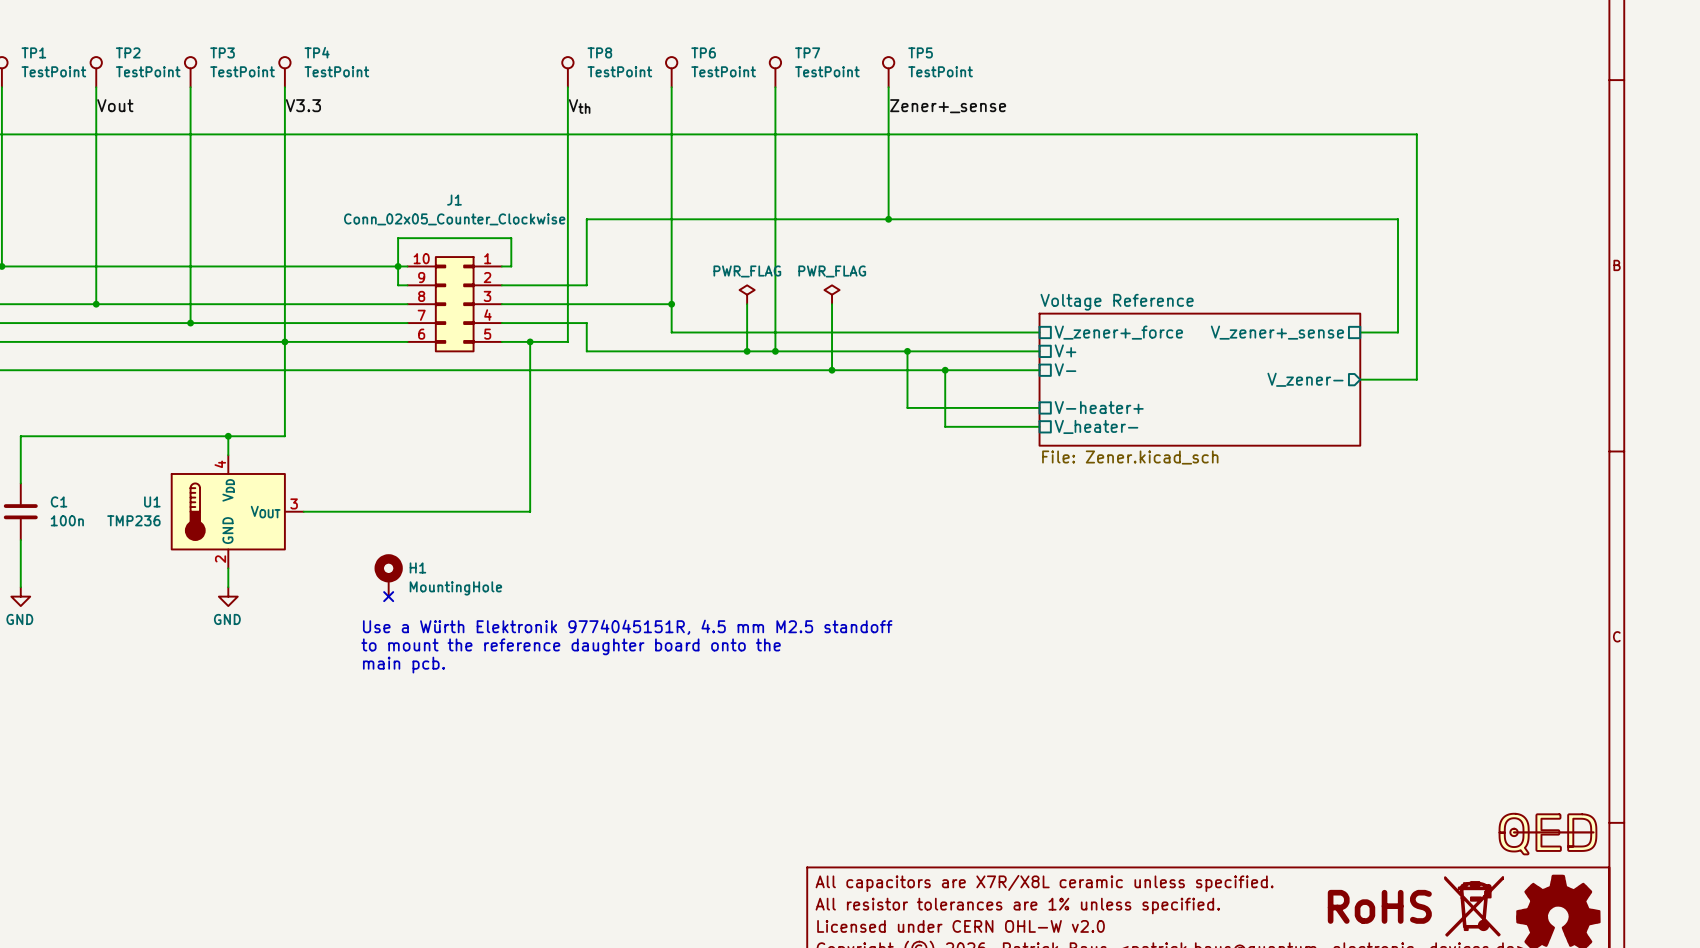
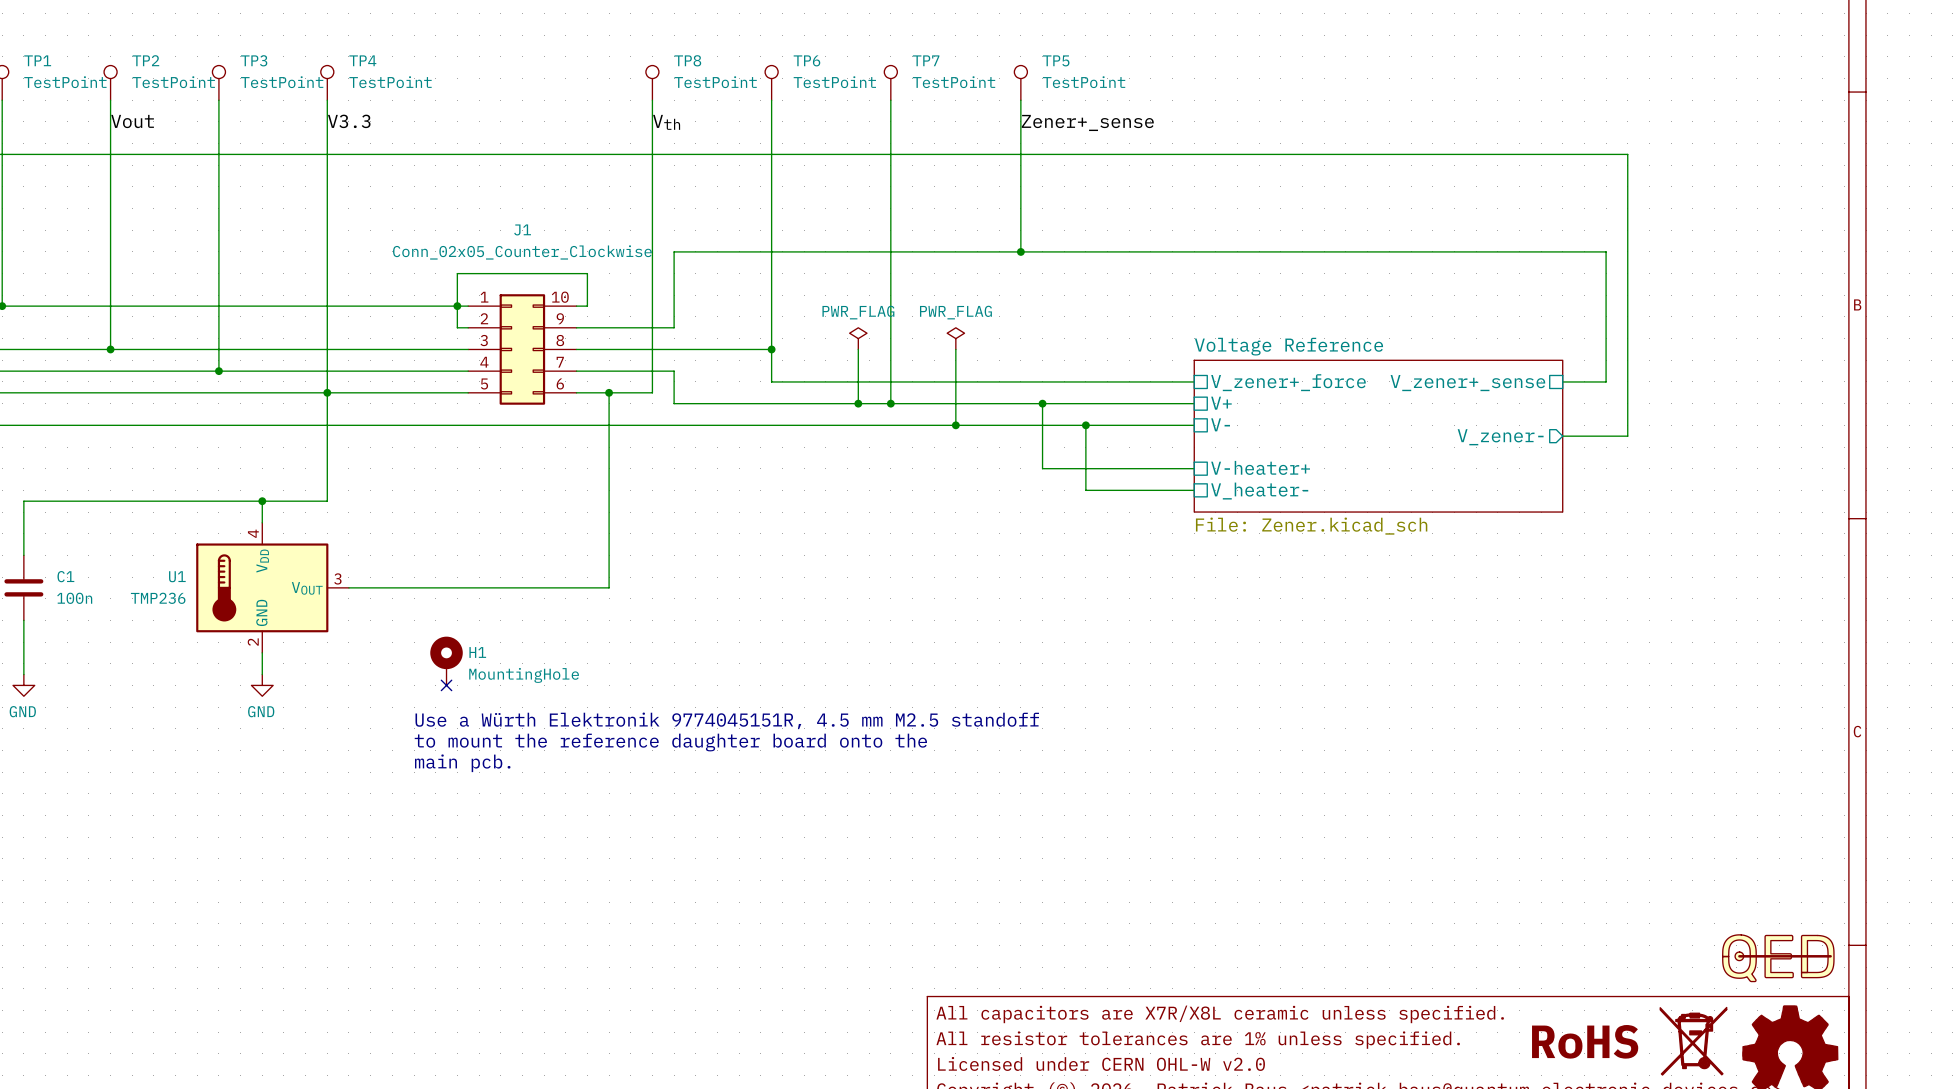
J1 flip: as is (454, 304) -> left-right (522, 349)

